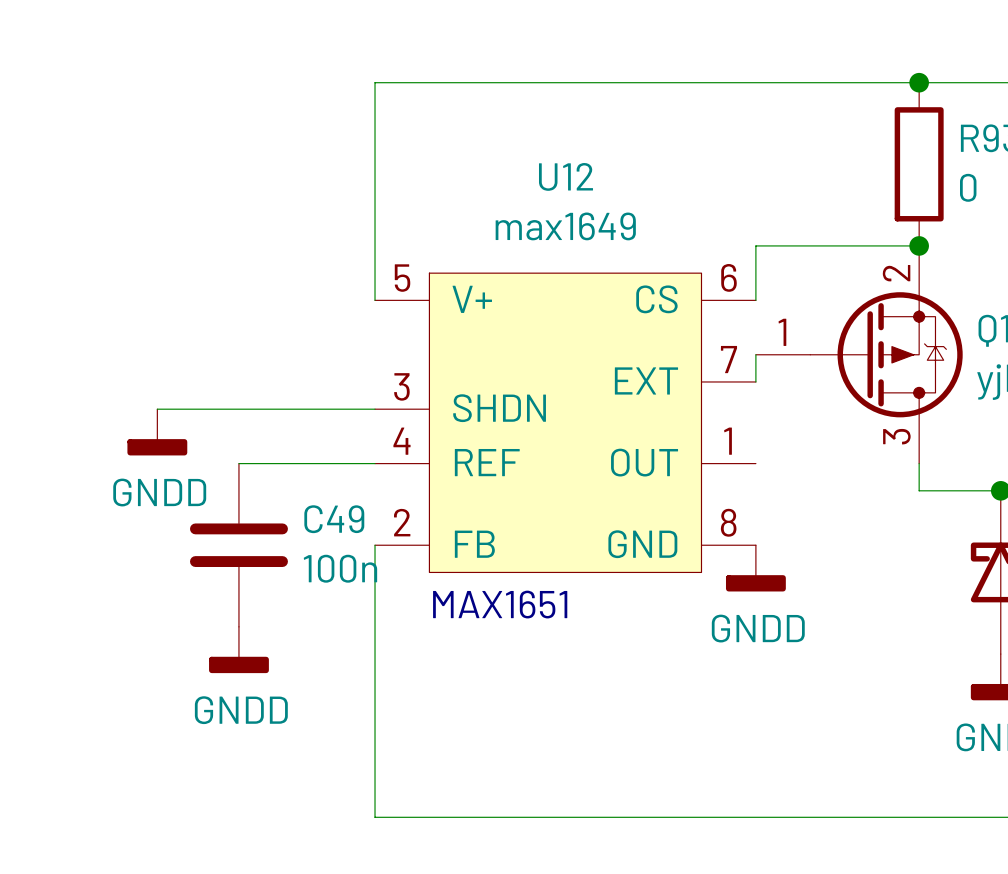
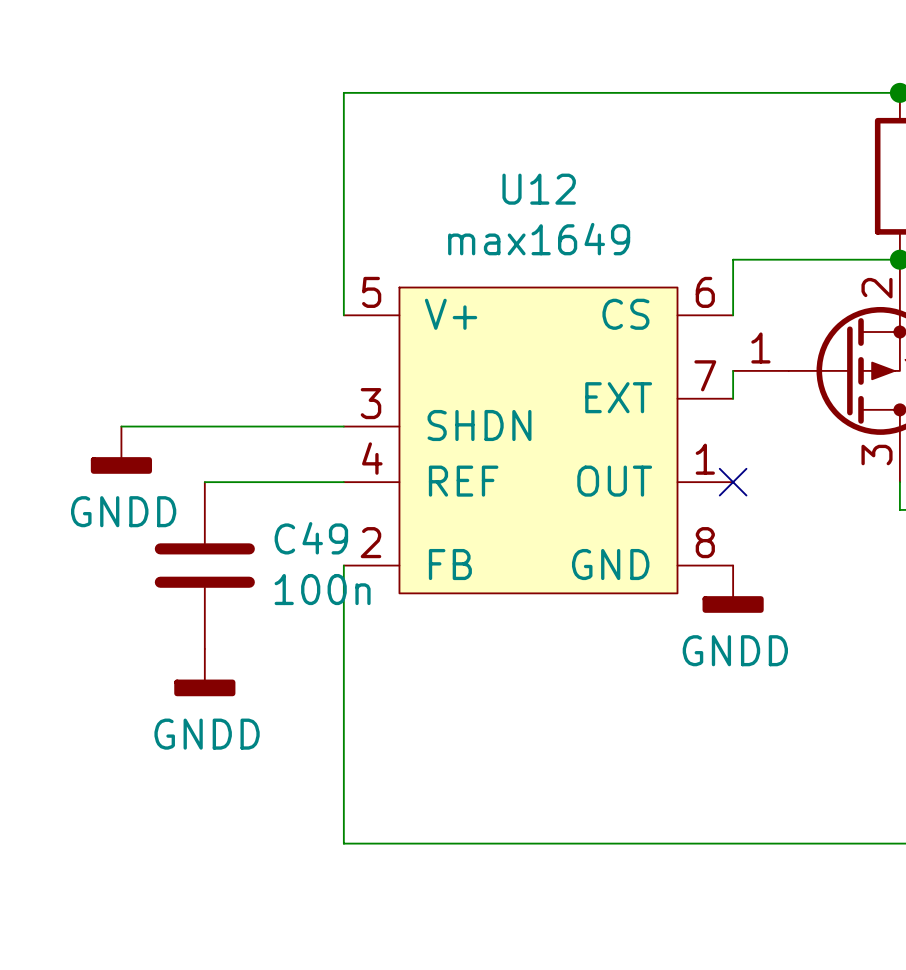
no-connect mark: none -> (733, 482)
text: MAX1651 (500, 604) -> none

